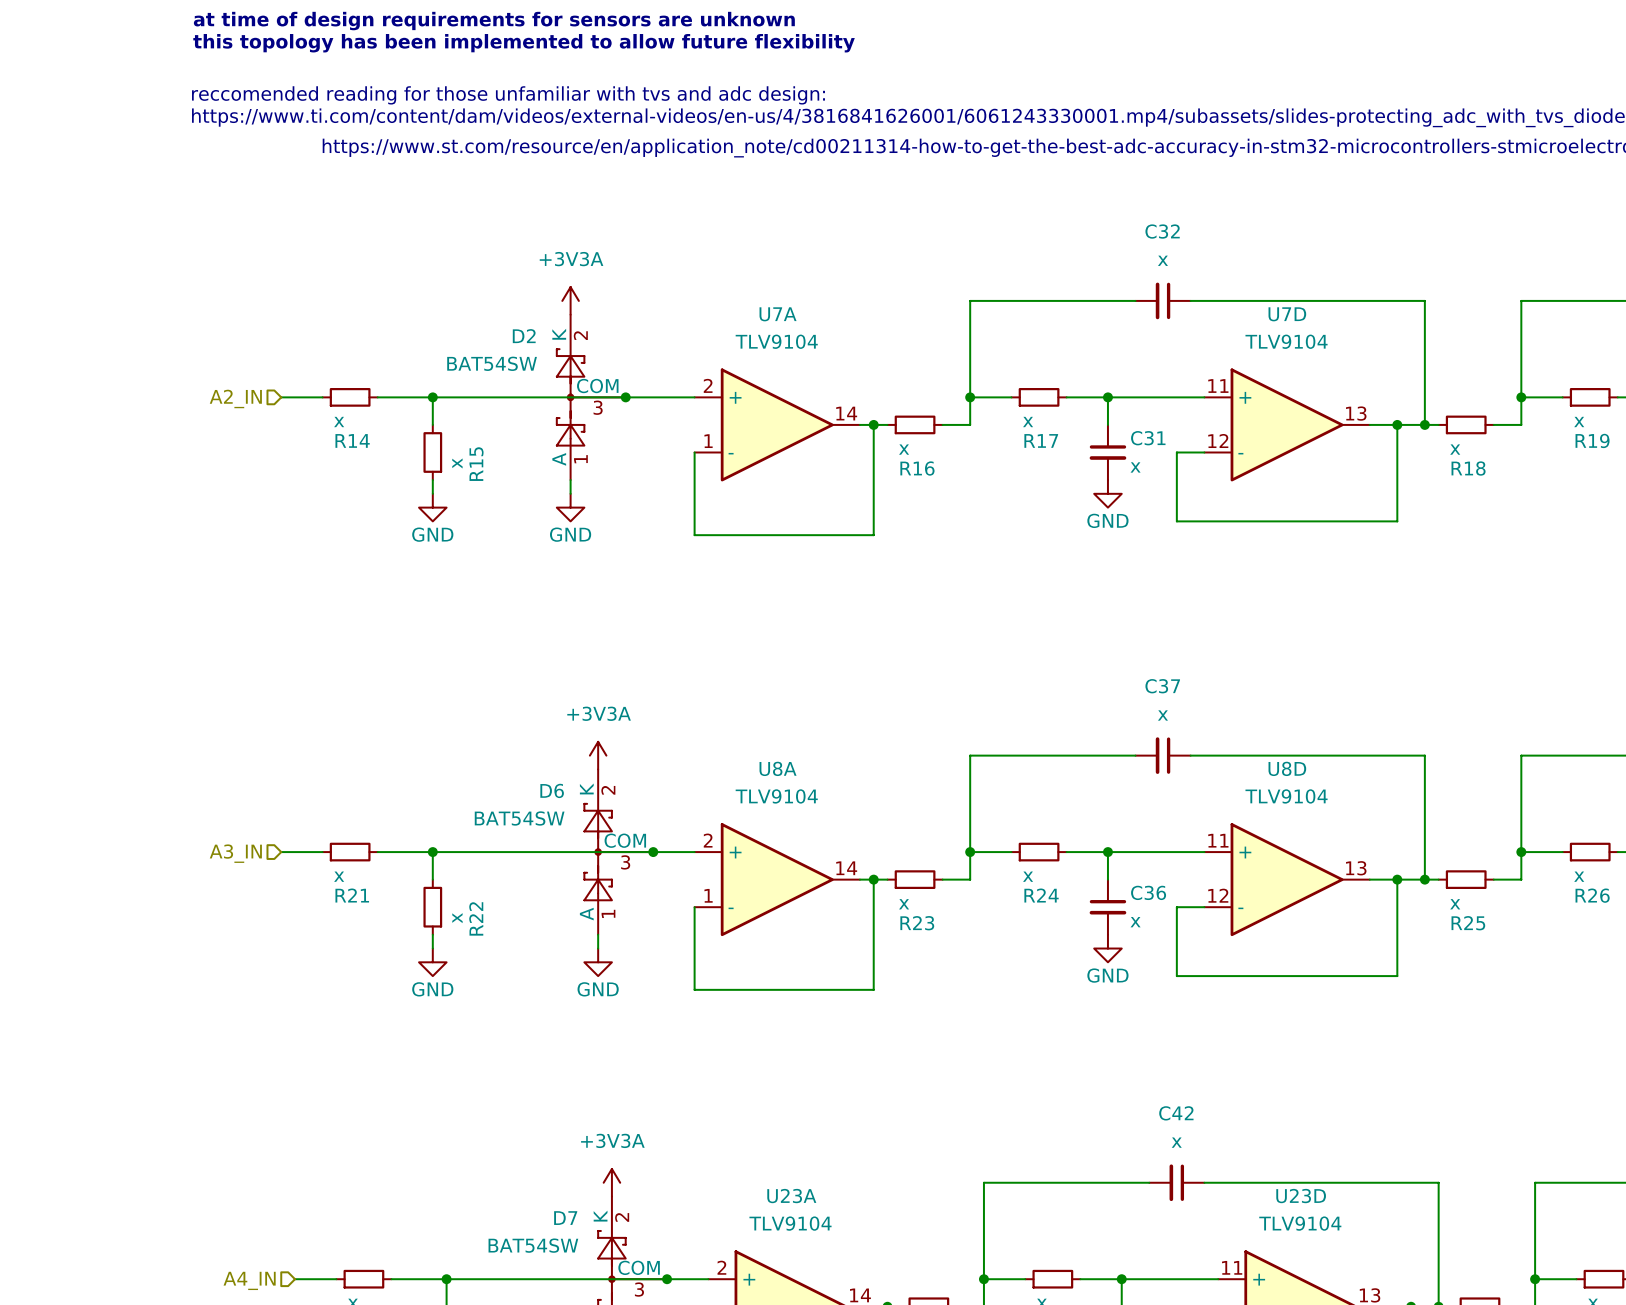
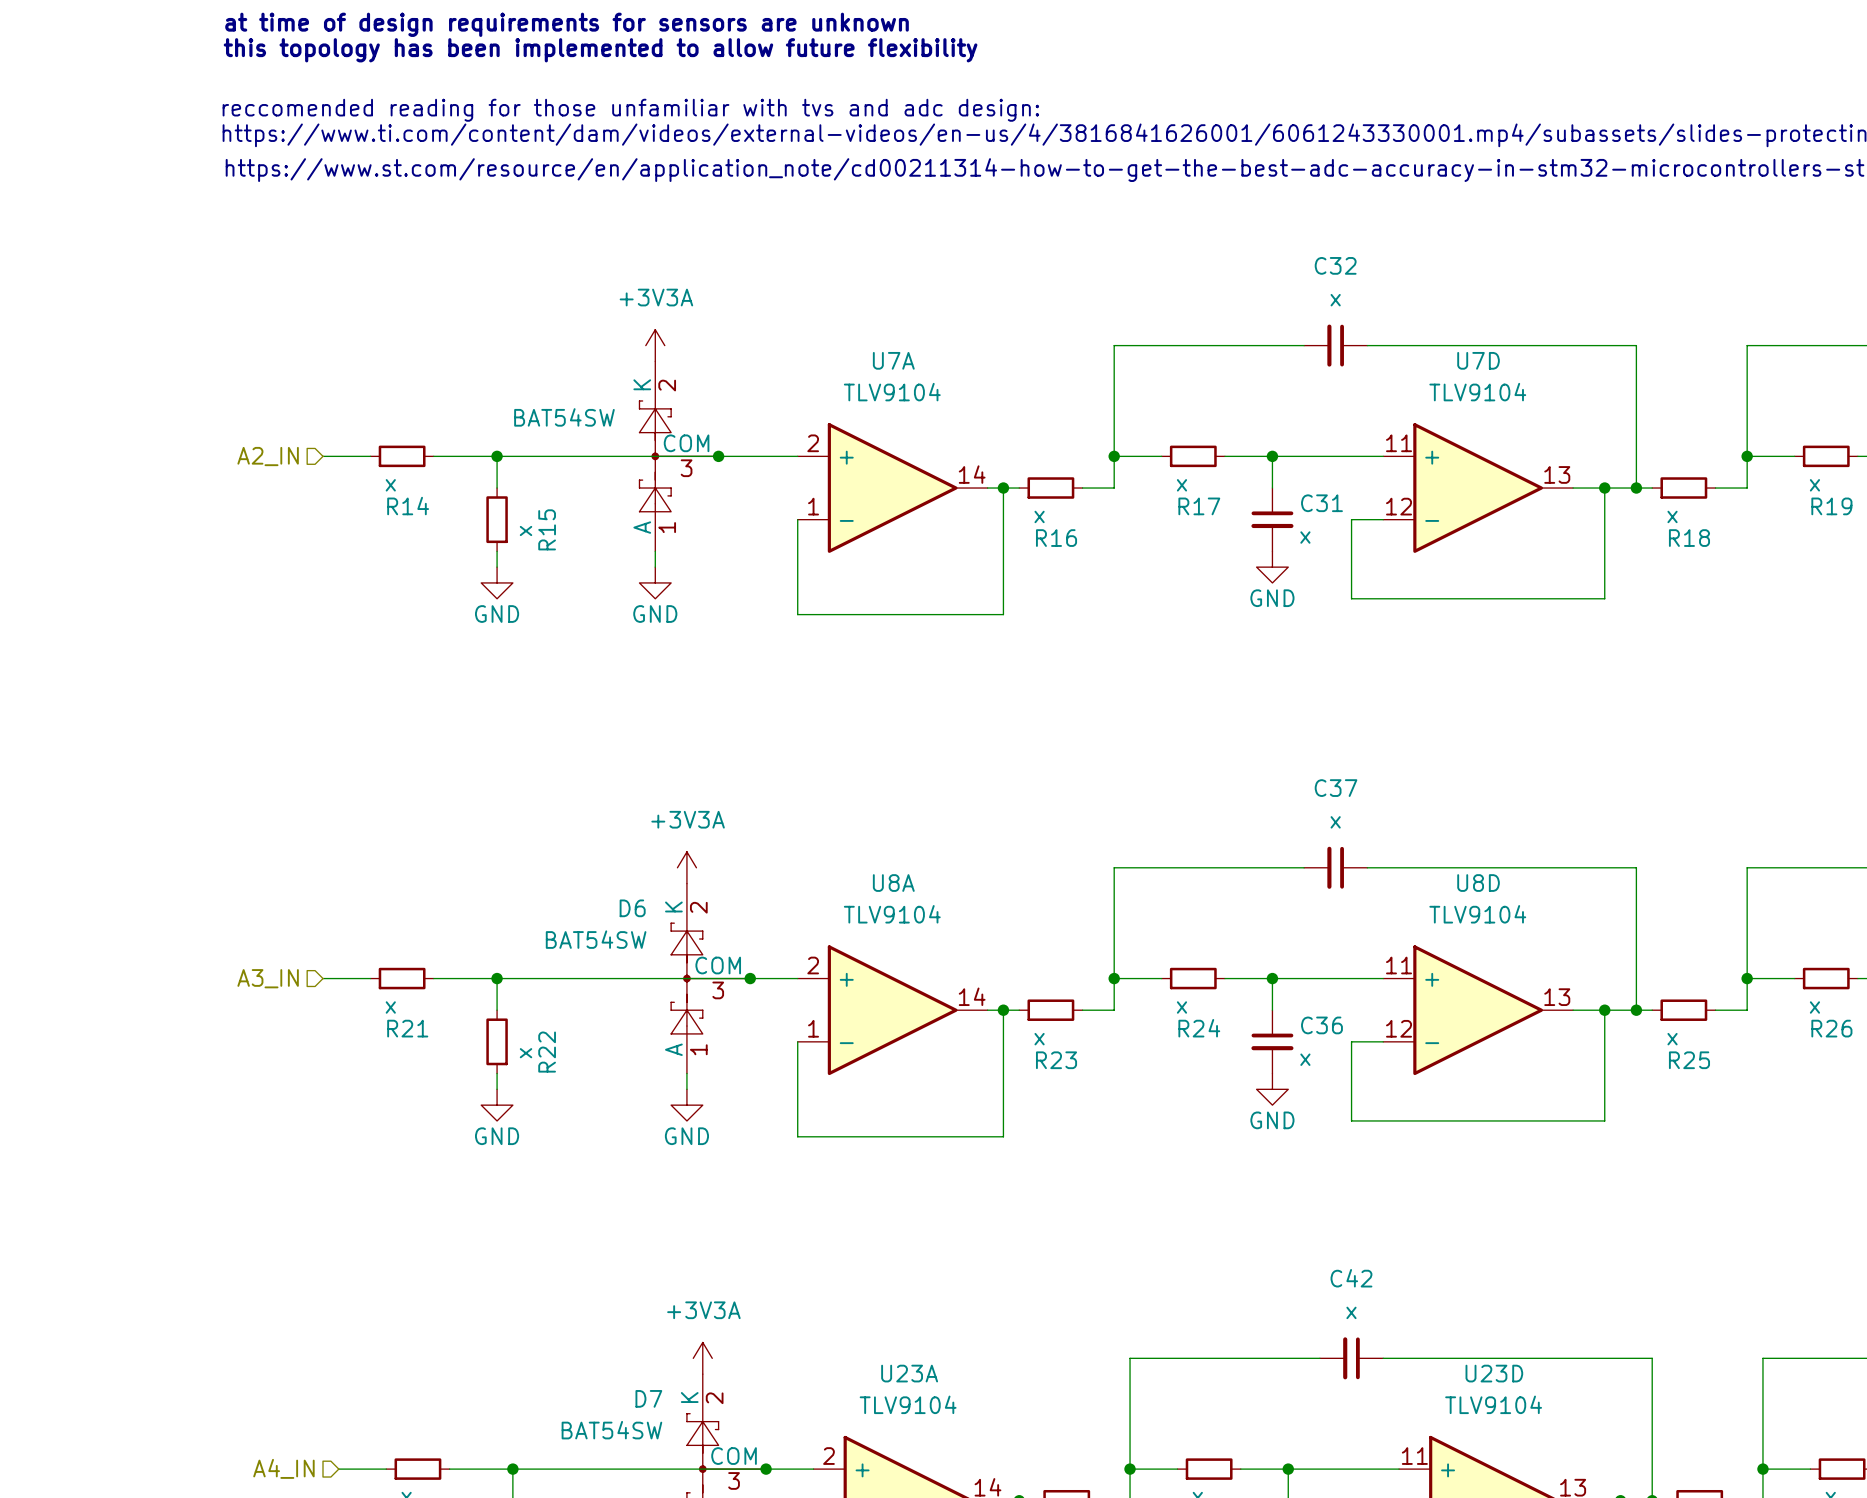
D2 name: D2 (524, 336) -> none

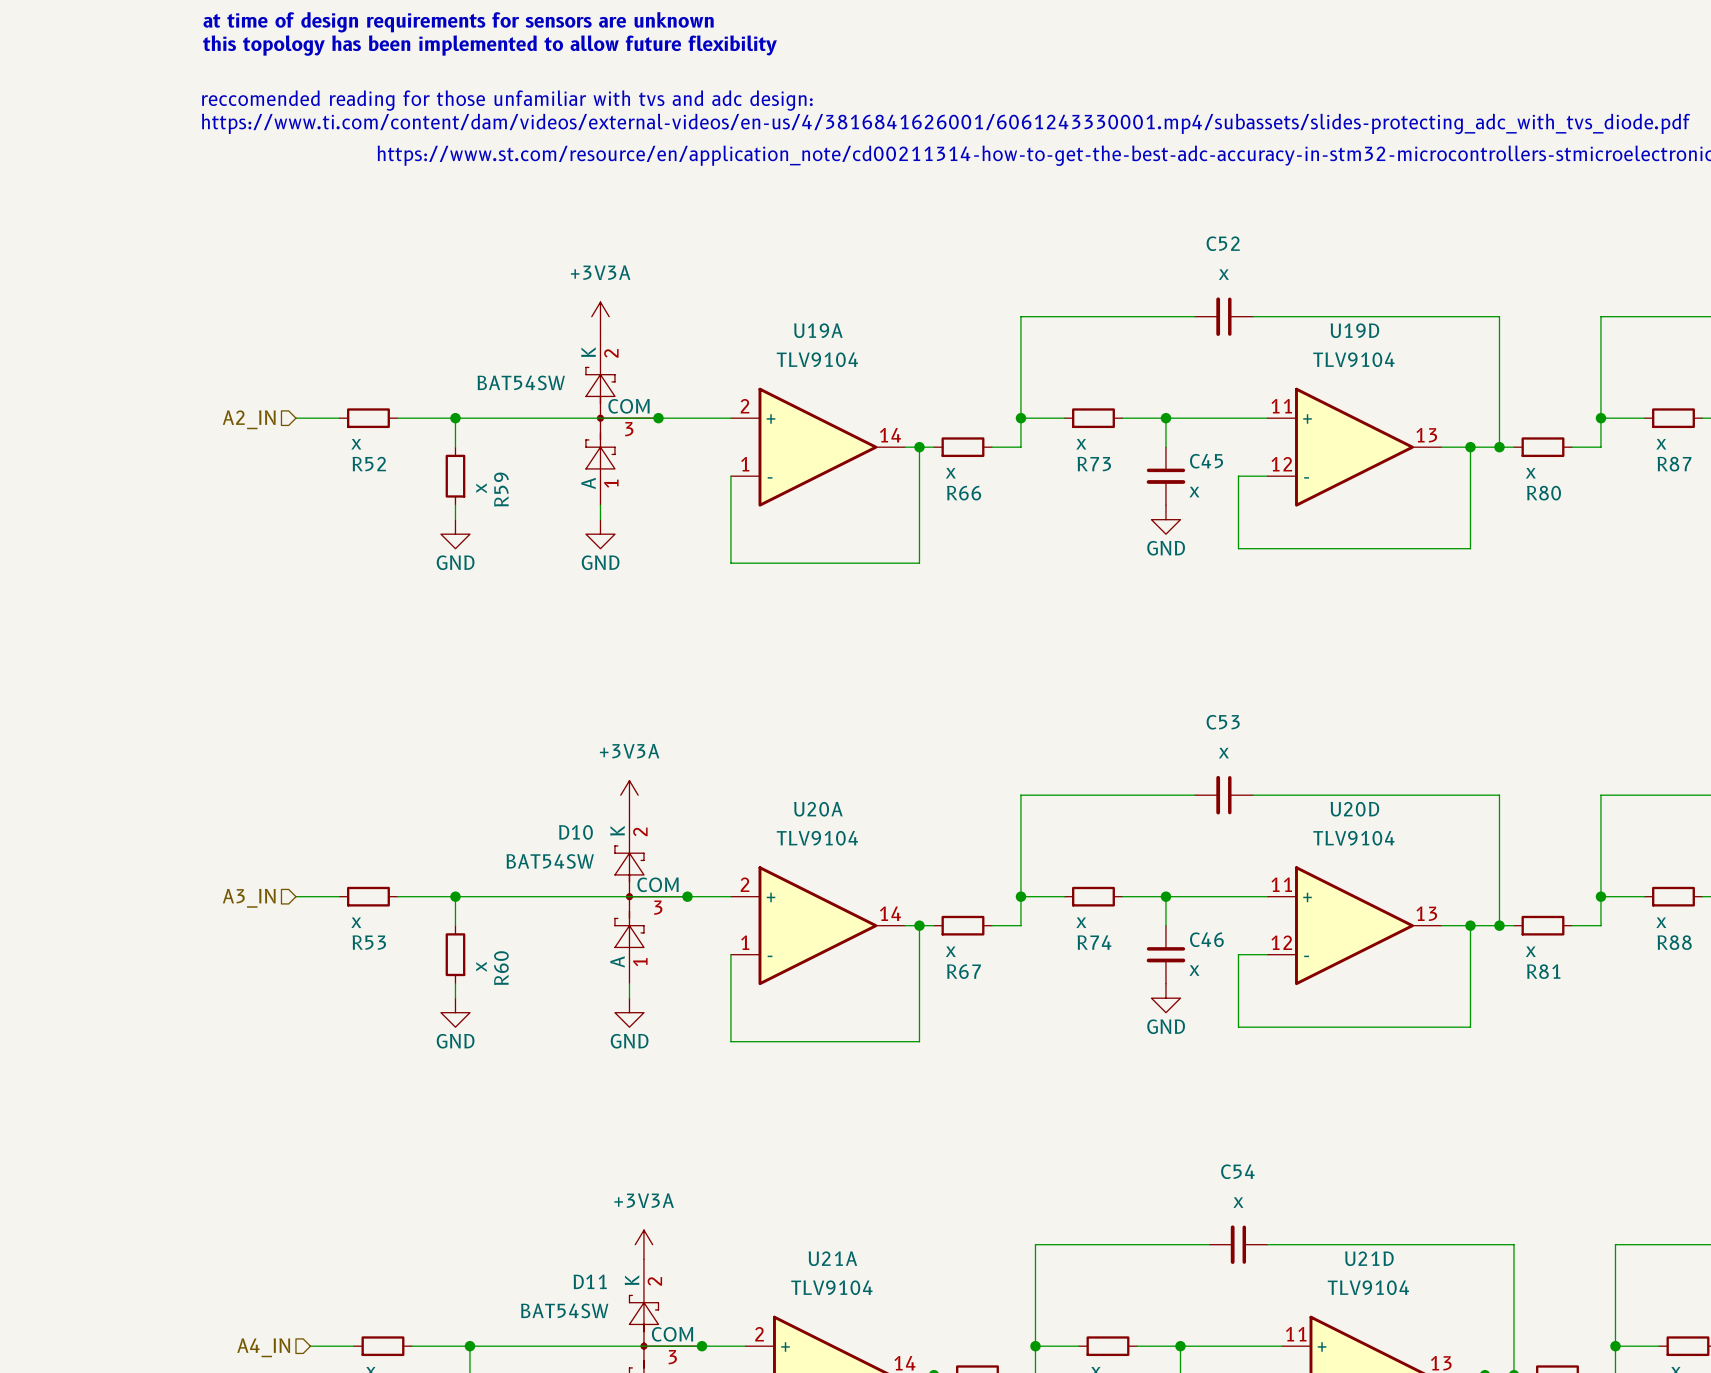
C32 name: C32 (1335, 265) -> C52 (1223, 243)
U7A name: U7A (893, 360) -> U19A (818, 330)
U7D name: U7D (1478, 360) -> U19D (1354, 330)
C31 name: C31 (1321, 503) -> C45 (1206, 461)
R14 name: R14 (408, 506) -> R52 (369, 464)
R17 name: R17 (1199, 506) -> R73 (1094, 464)
R19 name: R19 (1831, 506) -> R87 (1674, 464)
R15 name: R15 (547, 529) -> R59 (501, 489)
R16 name: R16 (1056, 538) -> R66 (964, 493)
R18 name: R18 (1689, 538) -> R80 (1544, 493)
C37 name: C37 (1336, 788) -> C53 (1223, 722)
U8A name: U8A (893, 883) -> U20A (818, 809)
U8D name: U8D (1478, 883) -> U20D (1354, 809)
D6 name: D6 (632, 908) -> D10 (575, 832)
C36 name: C36 (1321, 1025) -> C46 (1206, 939)
R21 name: R21 (407, 1028) -> R53 (369, 942)
R24 name: R24 (1199, 1028) -> R74 (1094, 942)
R26 name: R26 (1831, 1028) -> R88 (1674, 942)
R22 name: R22 (547, 1052) -> R60 (501, 968)
R23 name: R23 (1056, 1060) -> R67 (963, 971)
R25 name: R25 (1689, 1060) -> R81 (1543, 971)
C42 name: C42 (1351, 1278) -> C54 (1237, 1171)
U23A name: U23A (909, 1373) -> U21A (832, 1258)
U23D name: U23D (1494, 1373) -> U21D (1369, 1258)
D7 name: D7 (648, 1398) -> D11 (590, 1281)

